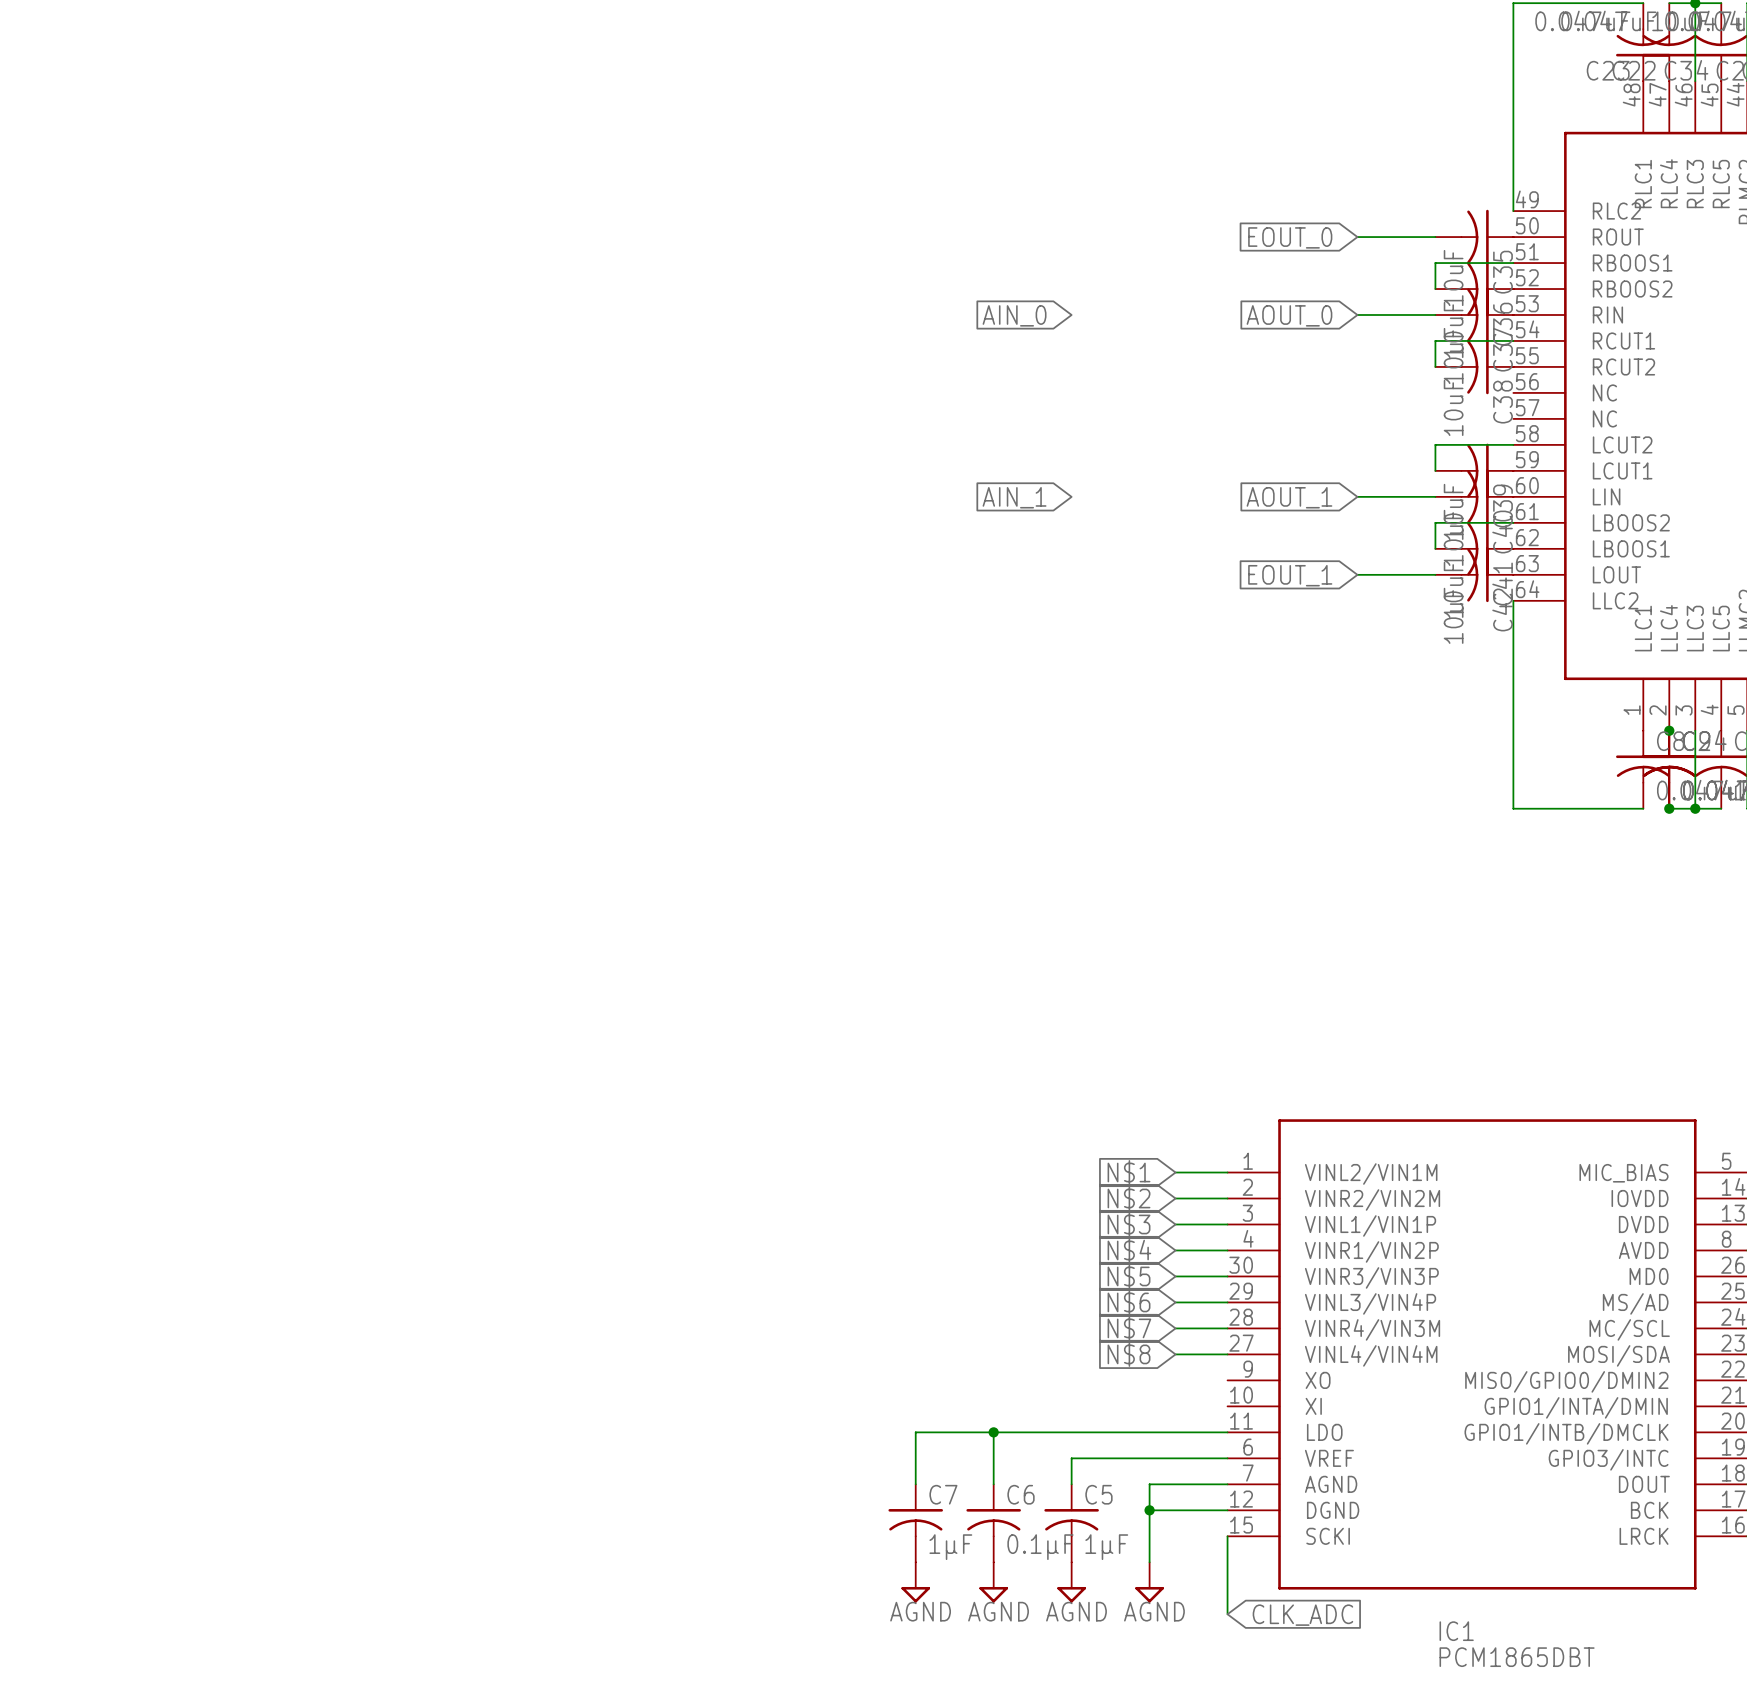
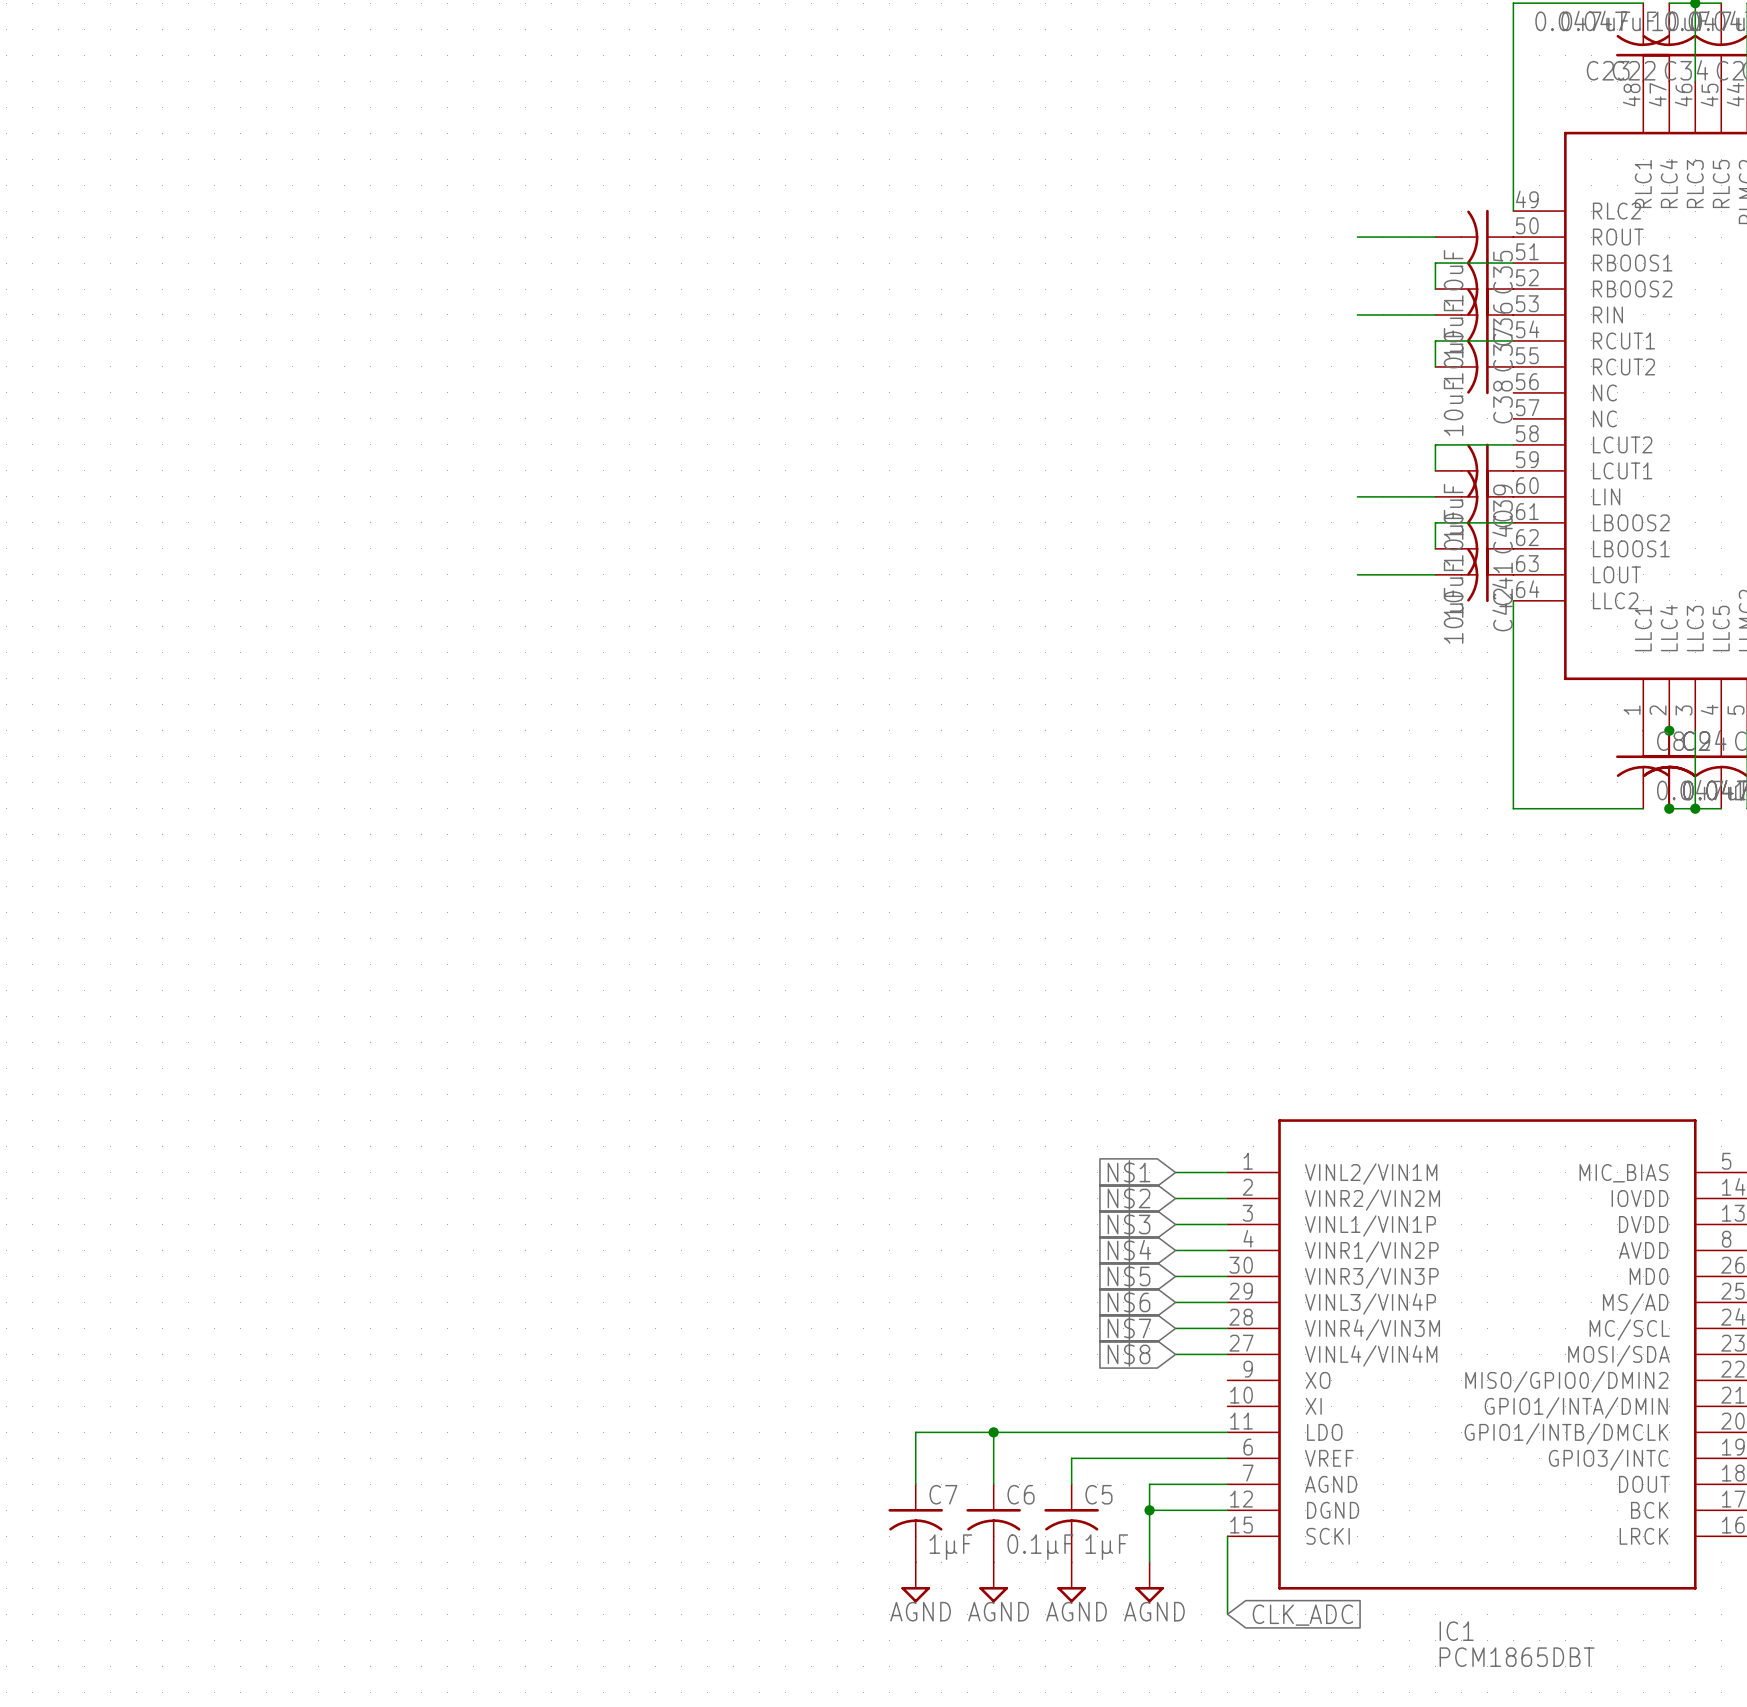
global label: EOUT_0 (1290, 237) -> none
global label: AIN_0 (1014, 315) -> none
global label: AOUT_0 (1289, 315) -> none
global label: AIN_1 (1014, 497) -> none
global label: AOUT_1 (1289, 497) -> none
global label: EOUT_1 (1290, 575) -> none

